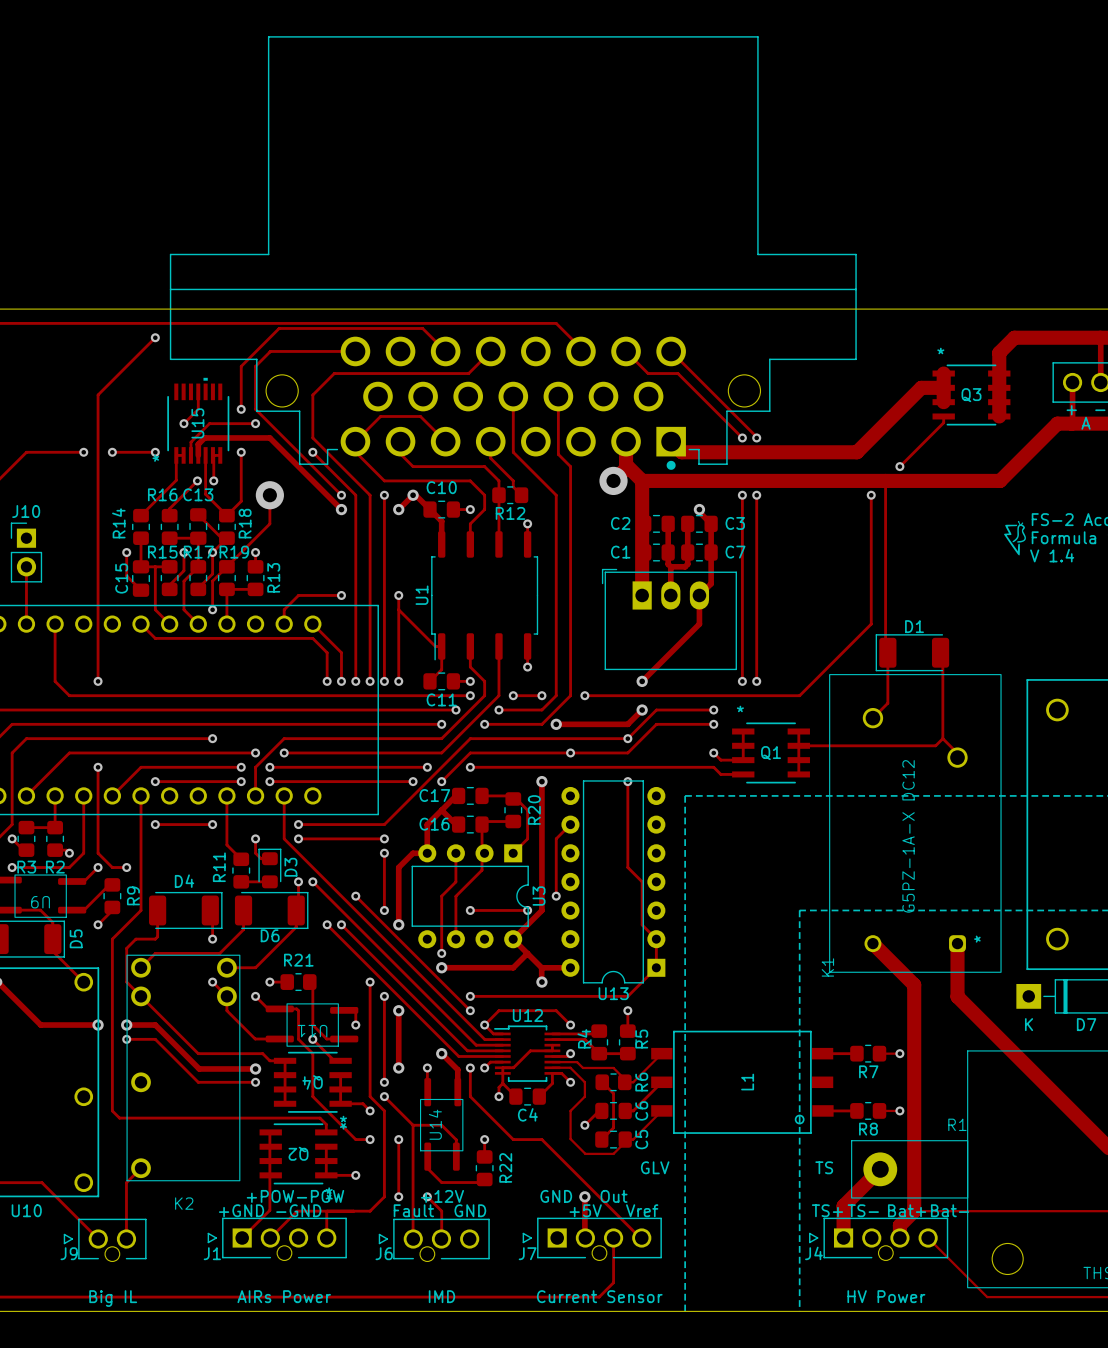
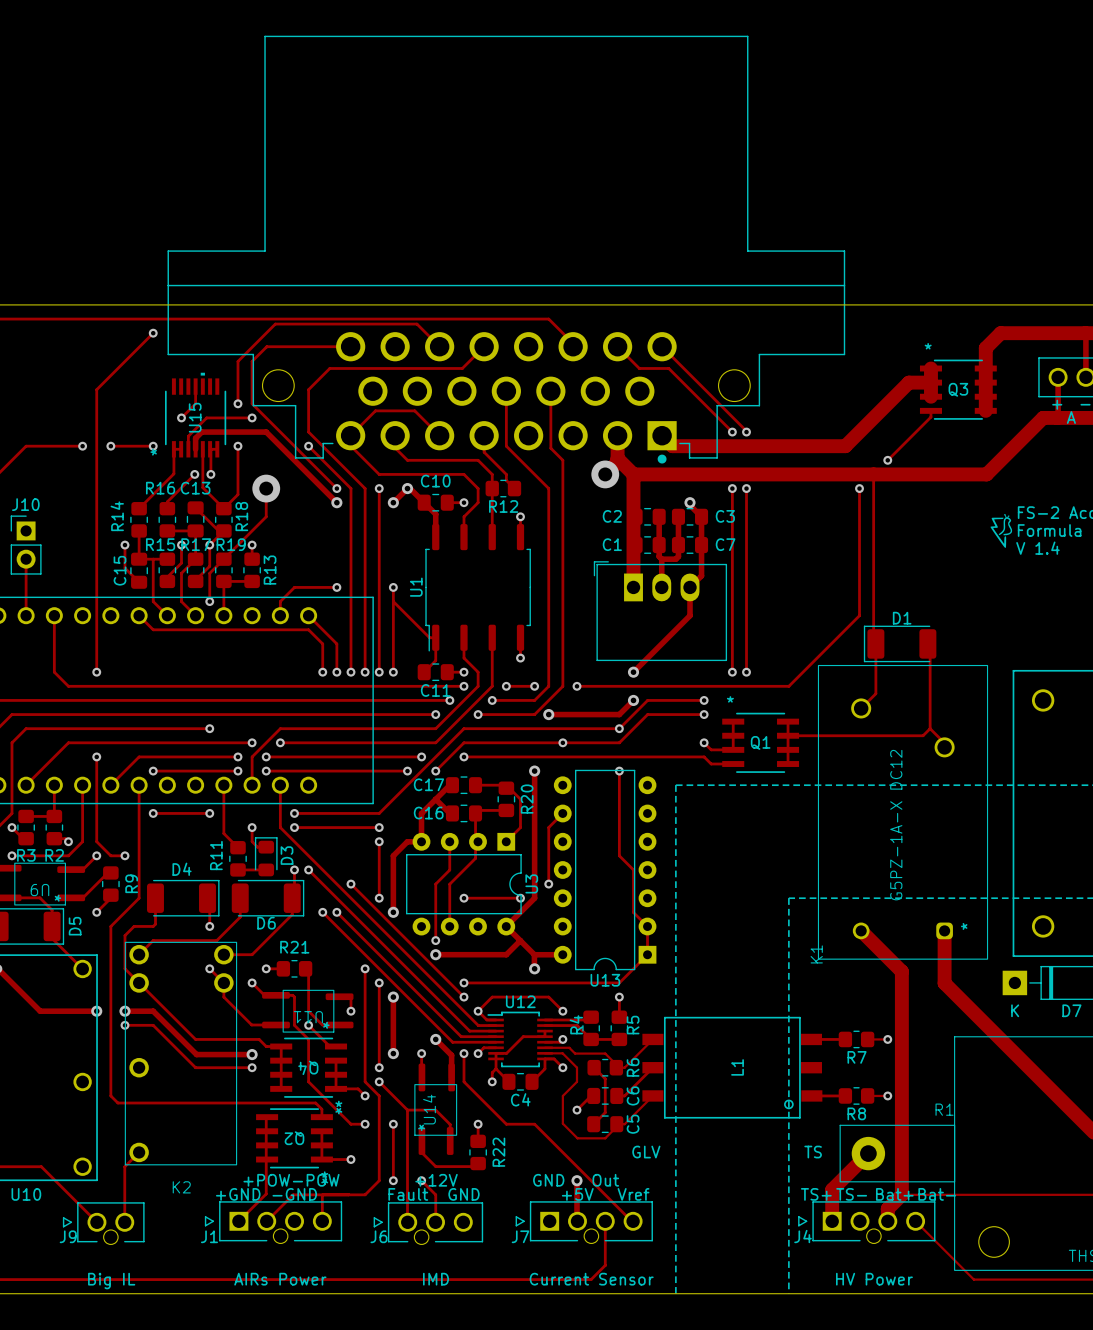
text: none -> * (57, 898)
text: none -> * (326, 1025)
text: none -> * (421, 1127)

